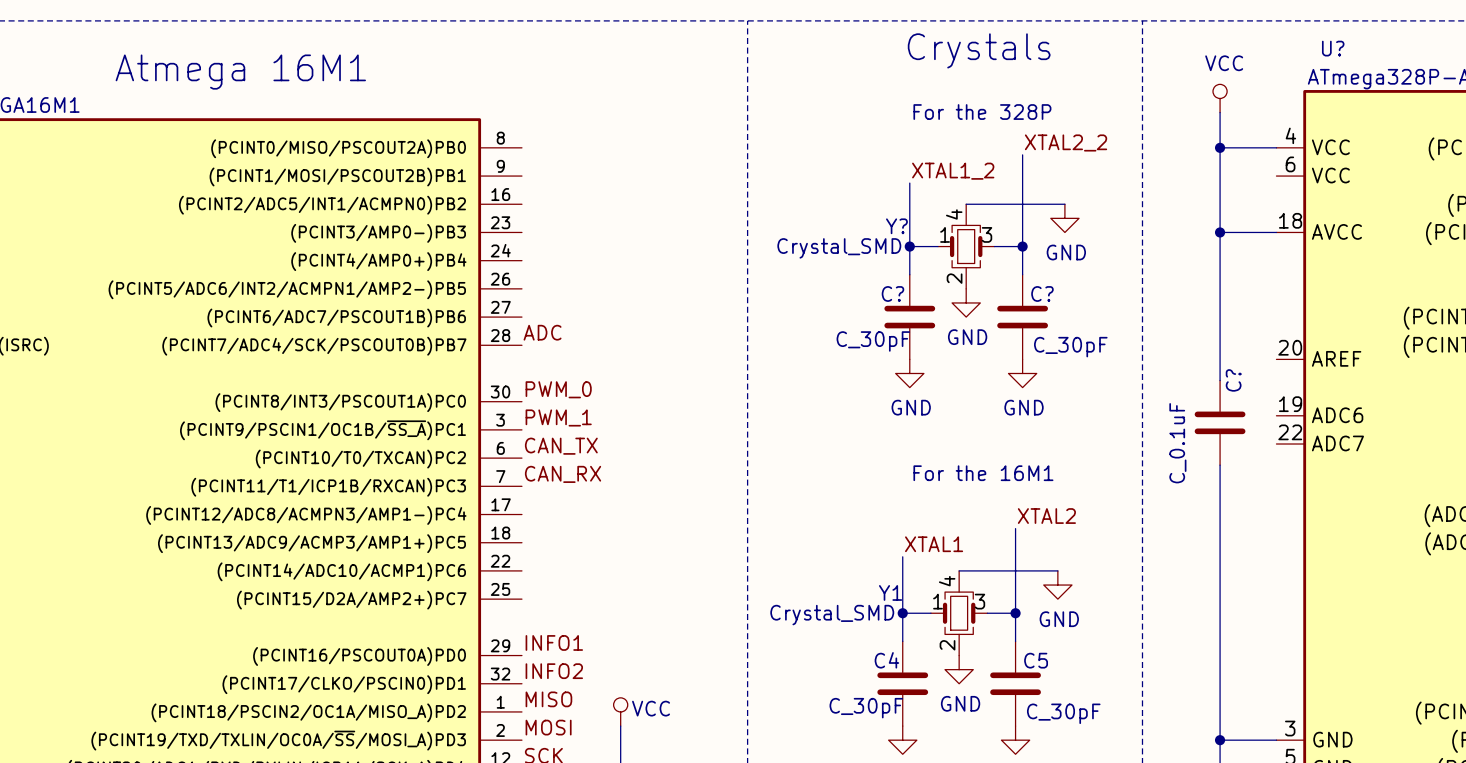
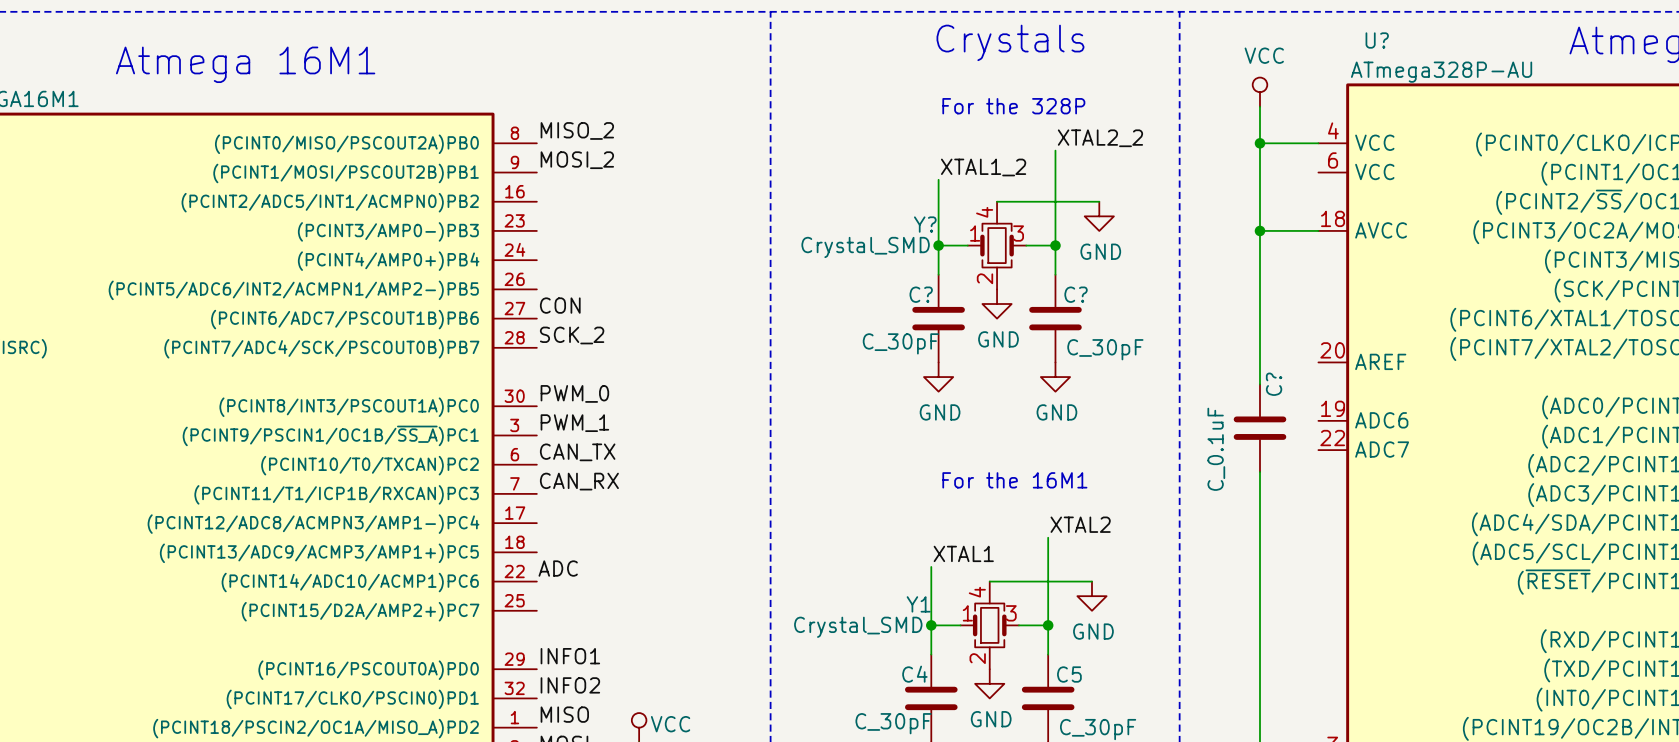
label: none -> MISO_2 (577, 130)
label: none -> MOSI_2 (577, 160)
label: none -> CON (560, 305)
label: ADC (542, 332) -> SCK_2 (572, 335)
label: none -> ADC (558, 568)

